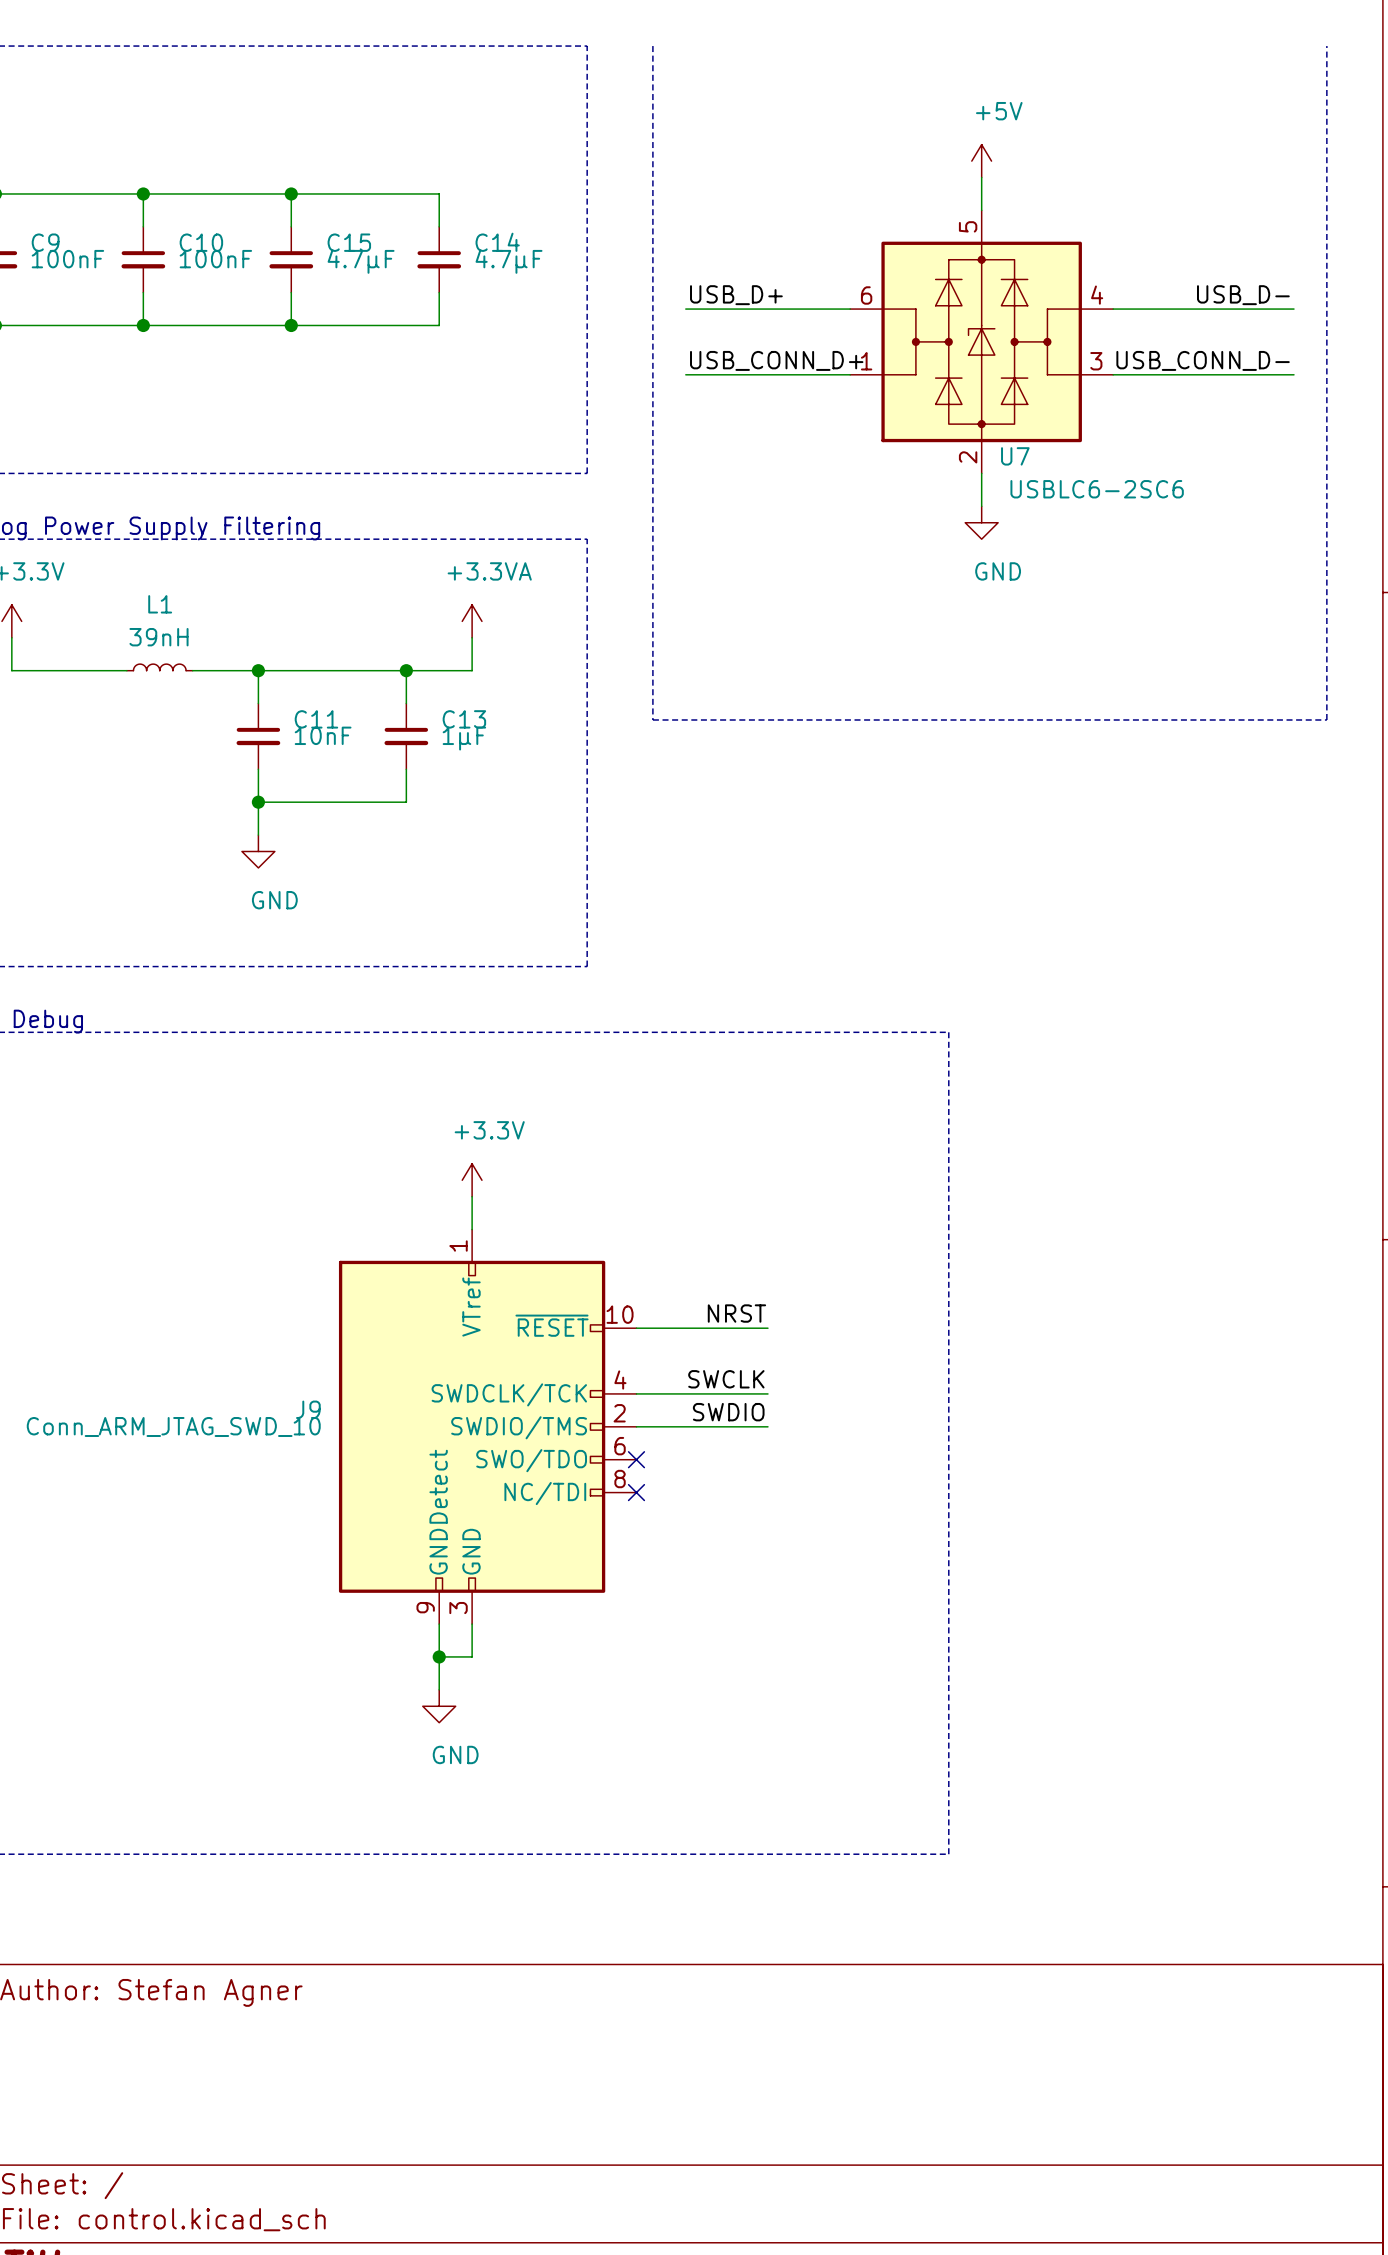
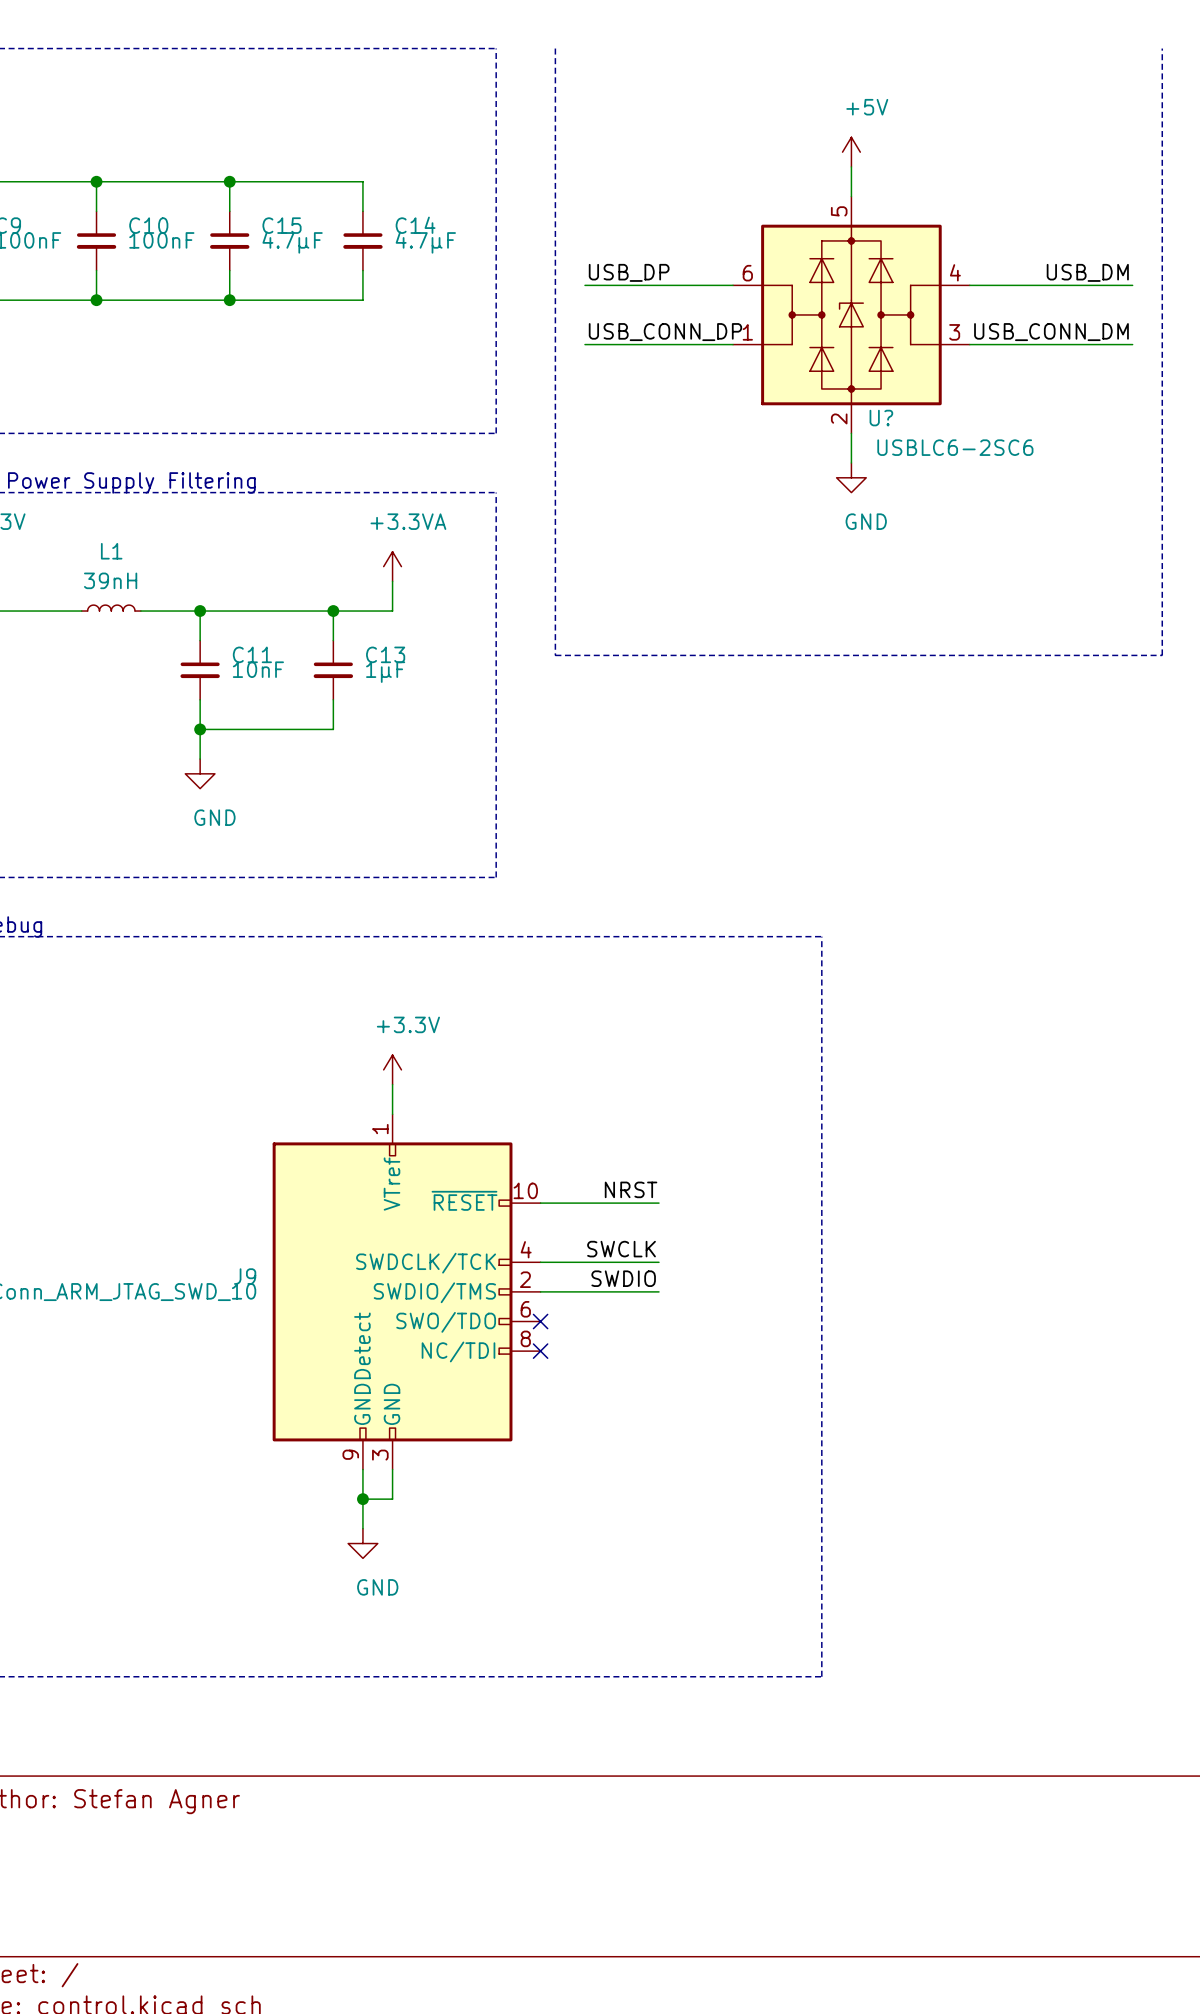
label: USB_D+ (736, 295) -> USB_DP (629, 272)
label: USB_D- (1243, 295) -> USB_DM (1087, 272)
label: USB_CONN_D+ (776, 360) -> USB_CONN_DP (665, 332)
label: USB_CONN_D- (1203, 360) -> USB_CONN_DM (1051, 332)
U7 name: U7 (1015, 456) -> U? (881, 418)

